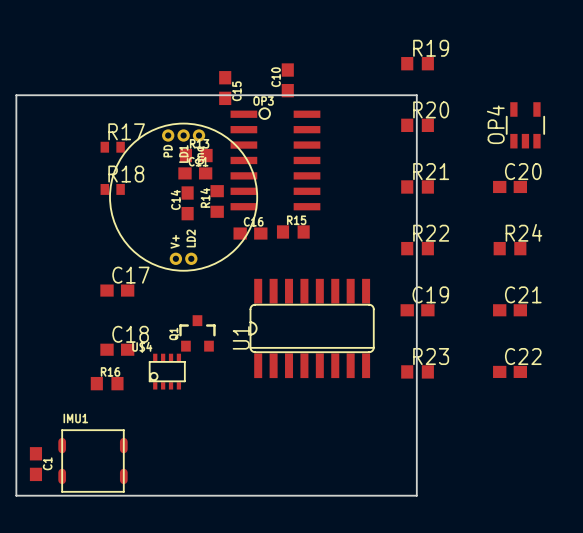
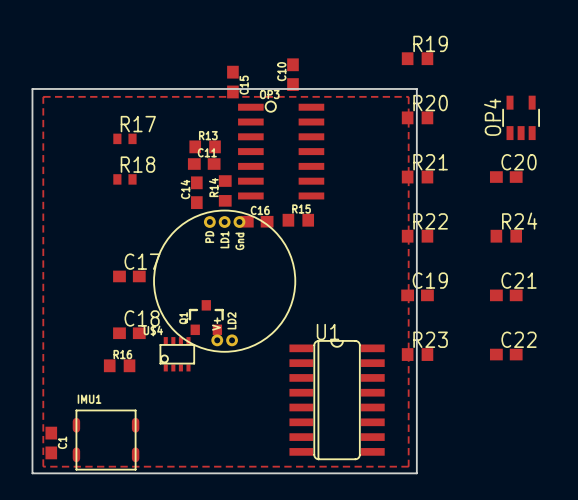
top zone outline: none -> (43, 96) (408, 96) (408, 466) (43, 466) (43, 96)
part position: (183, 197) -> (224, 281)
U1 rotation: 0° (312, 328) -> 90° clockwise (337, 400)
U1 position: (312, 328) -> (337, 400)

